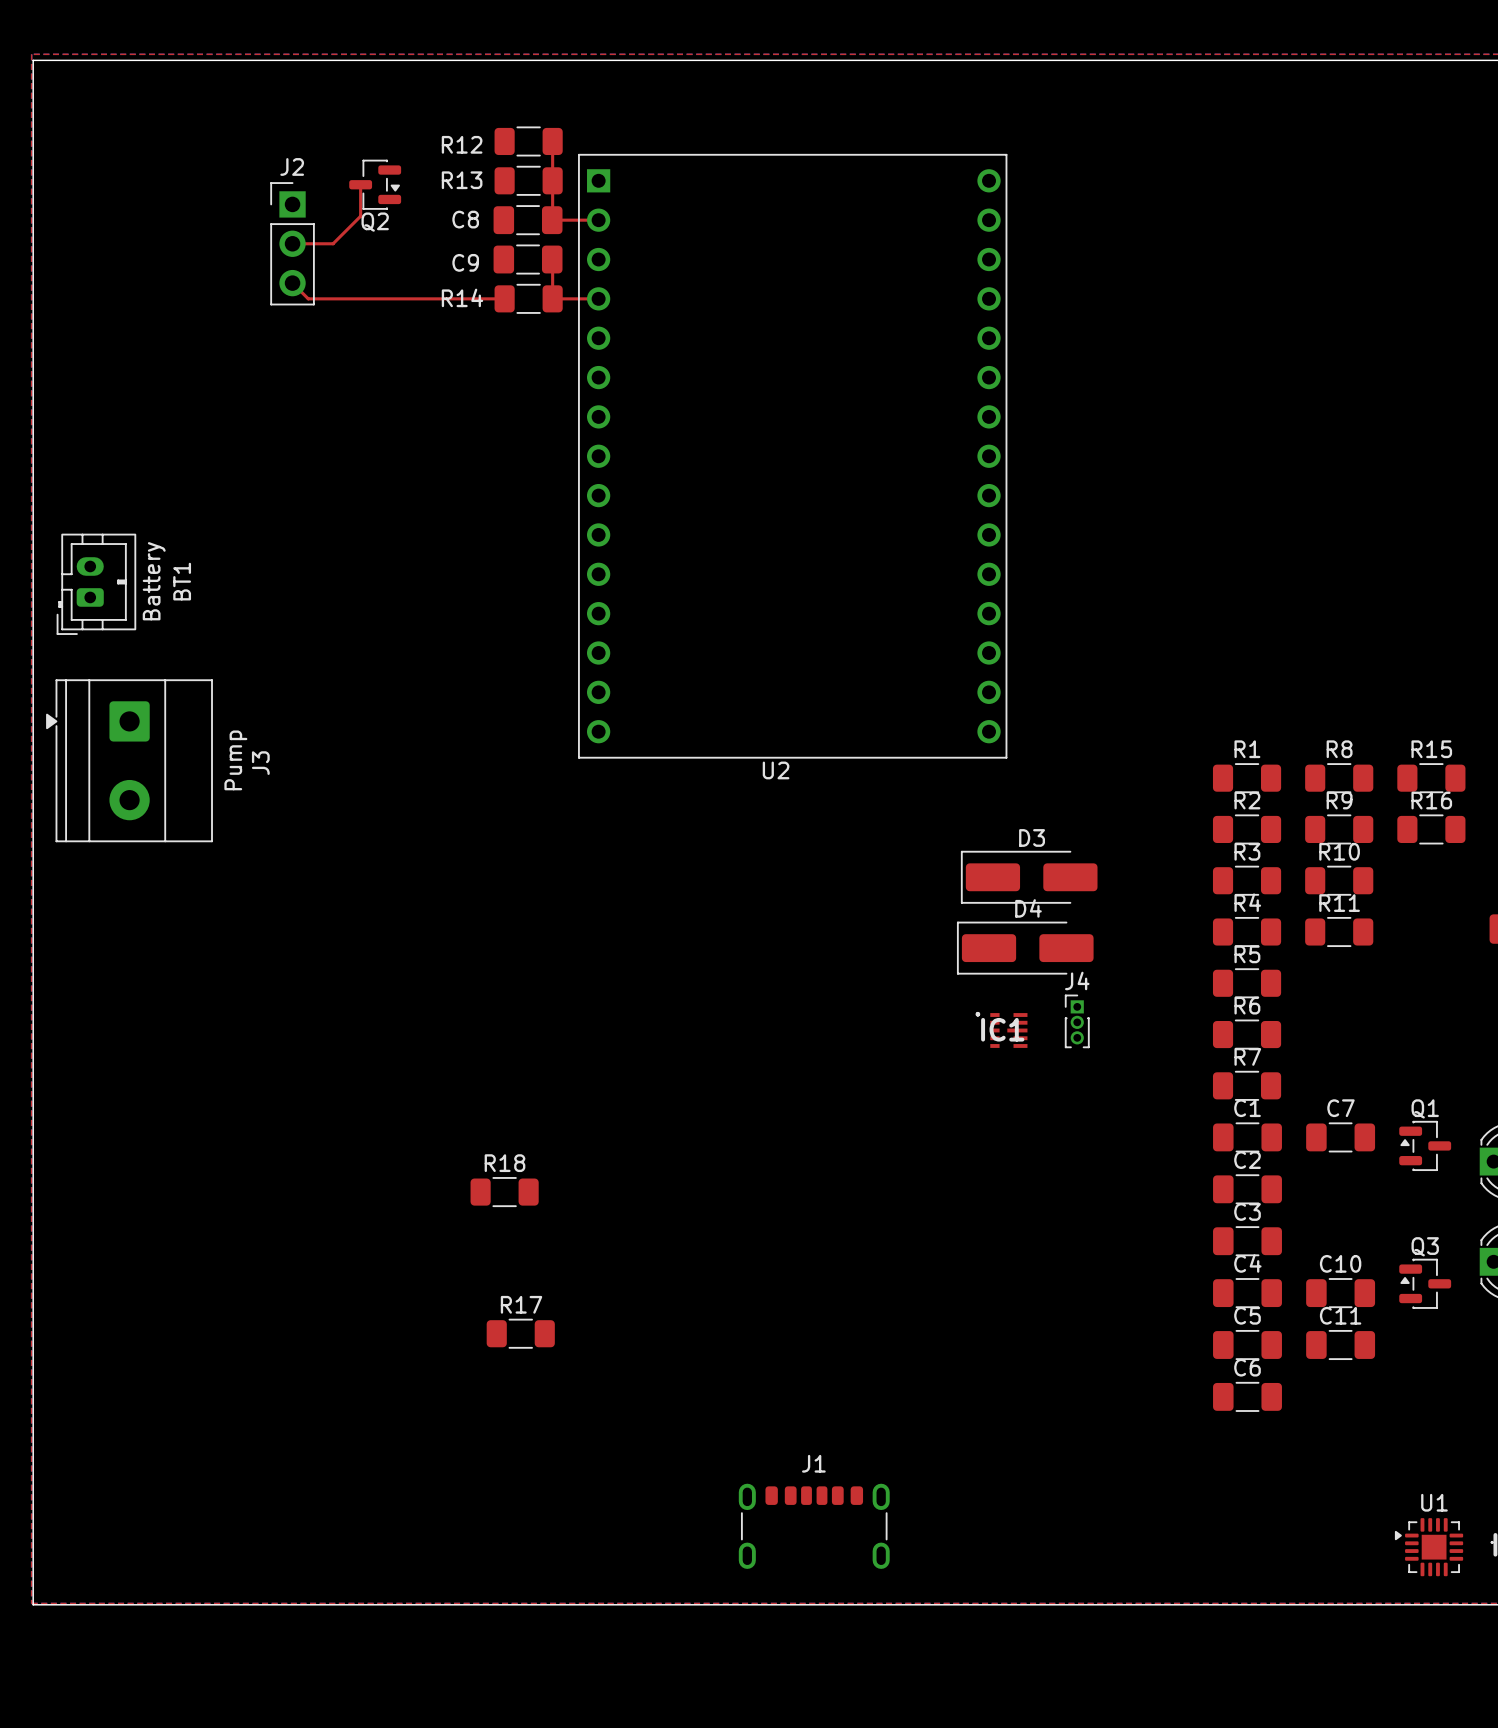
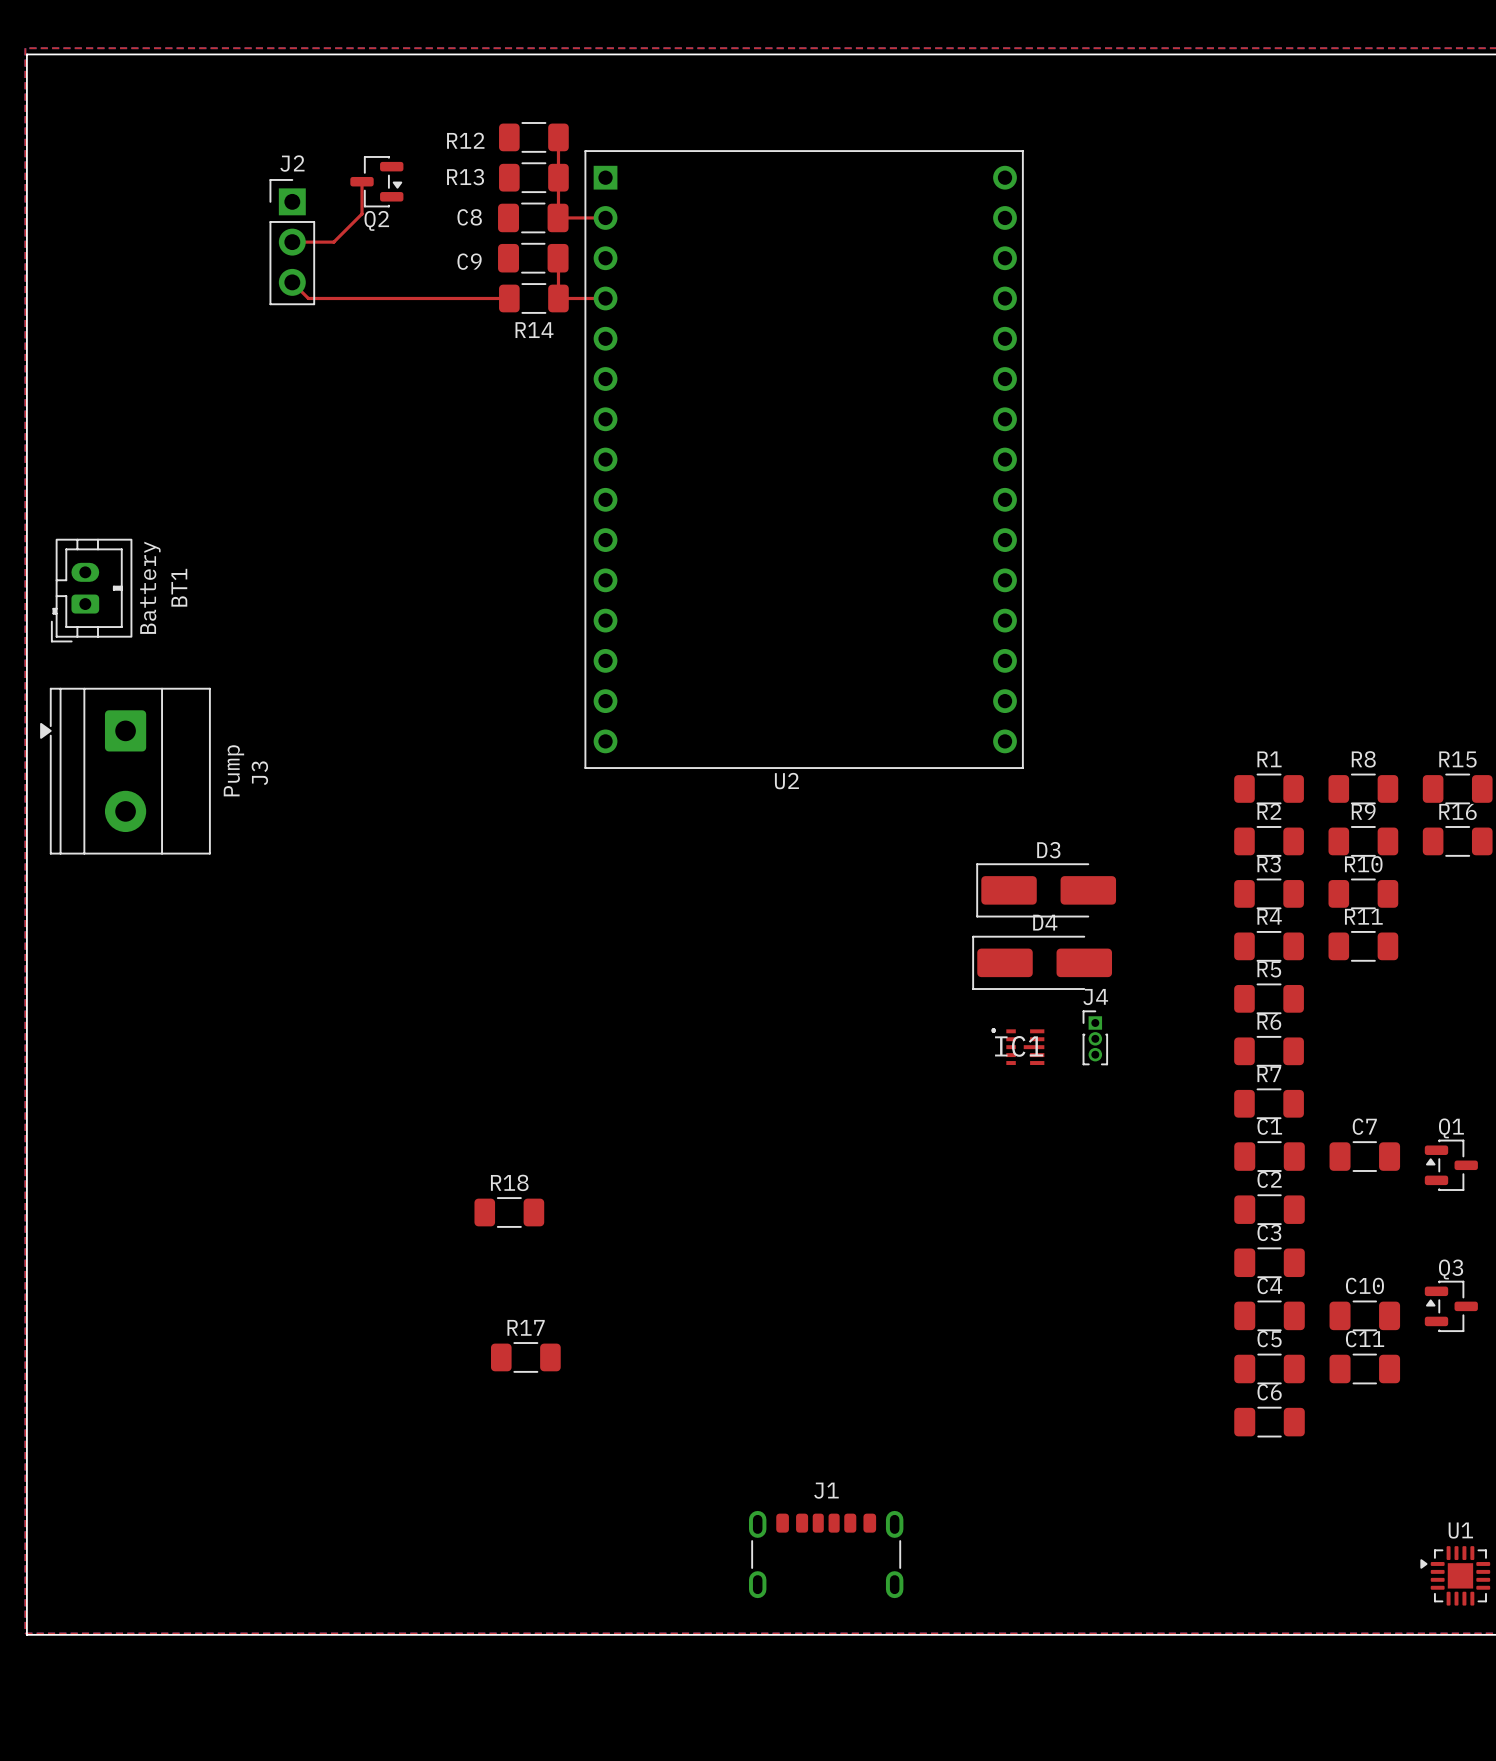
R14 name position: R14 (462, 297) -> R14 (534, 330)

